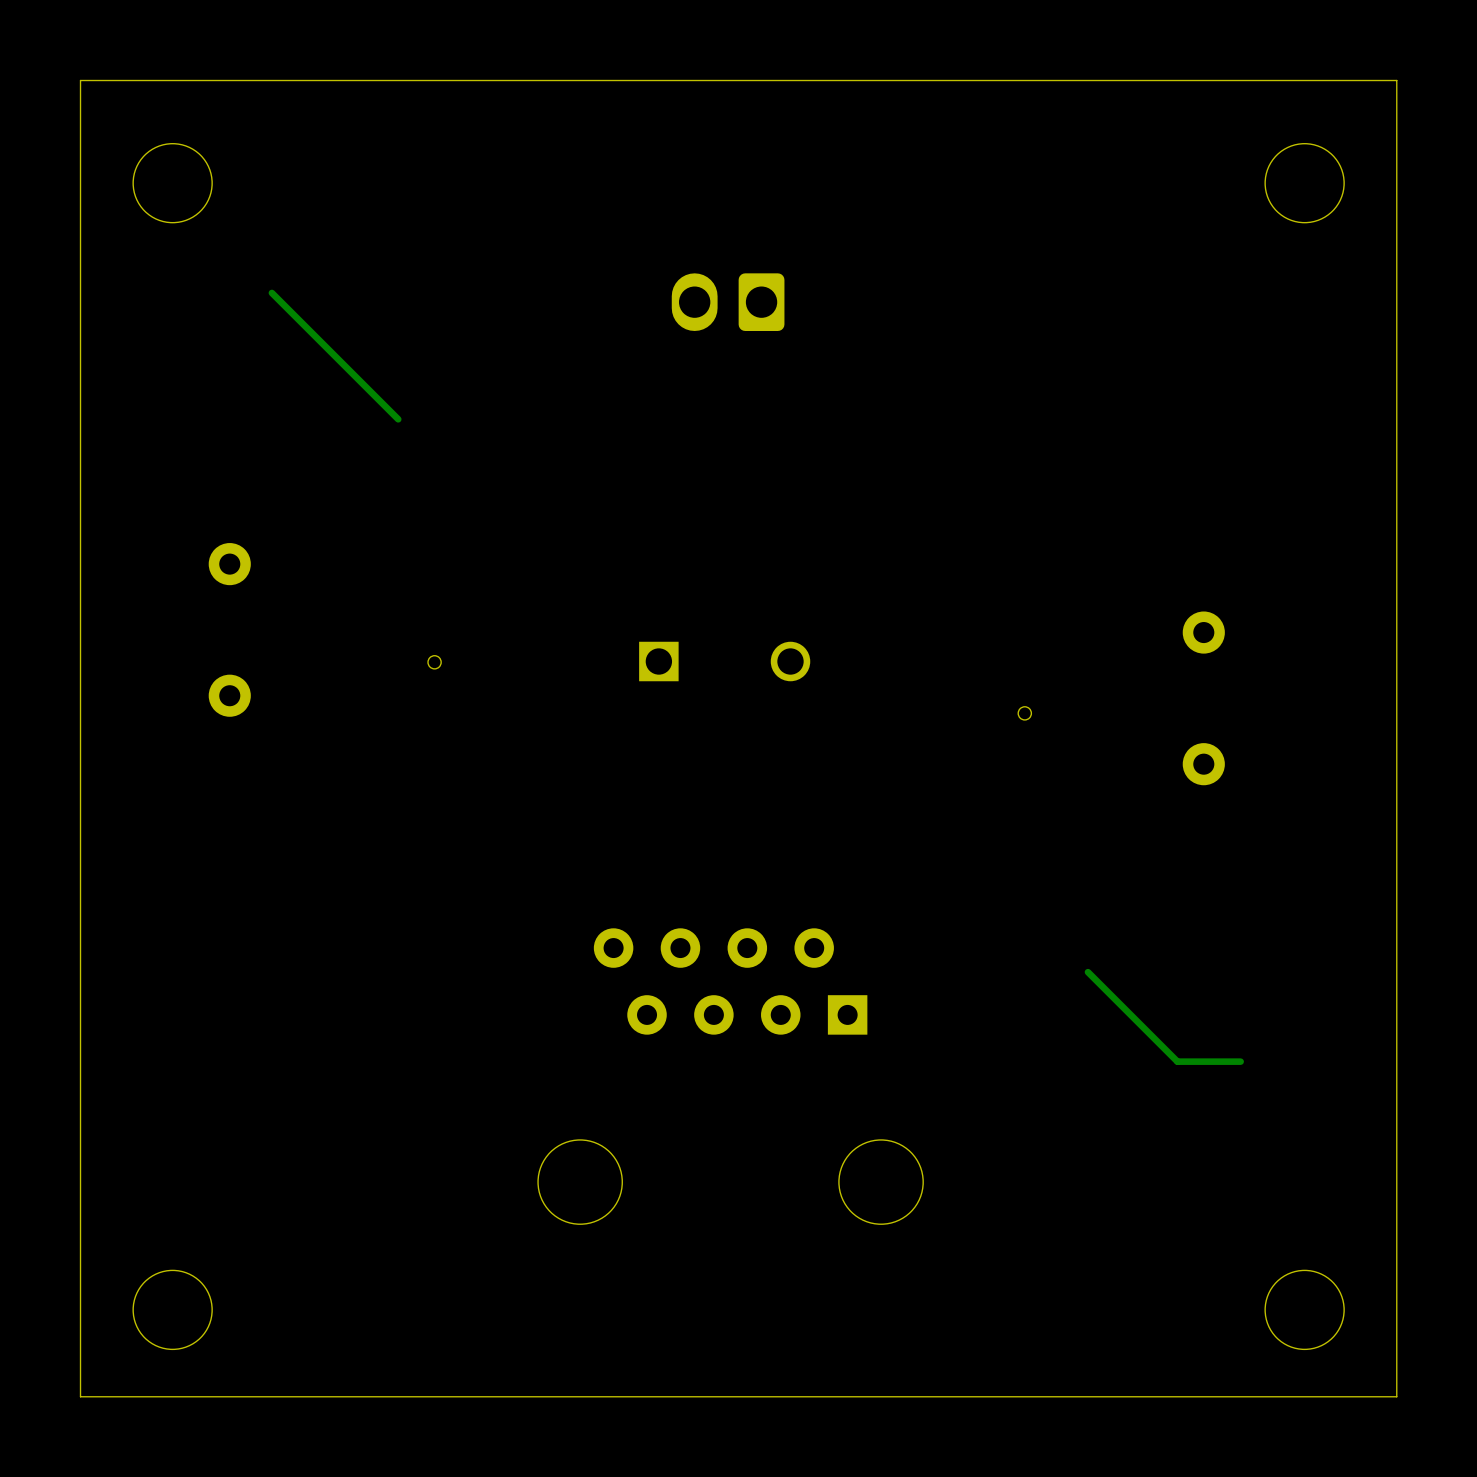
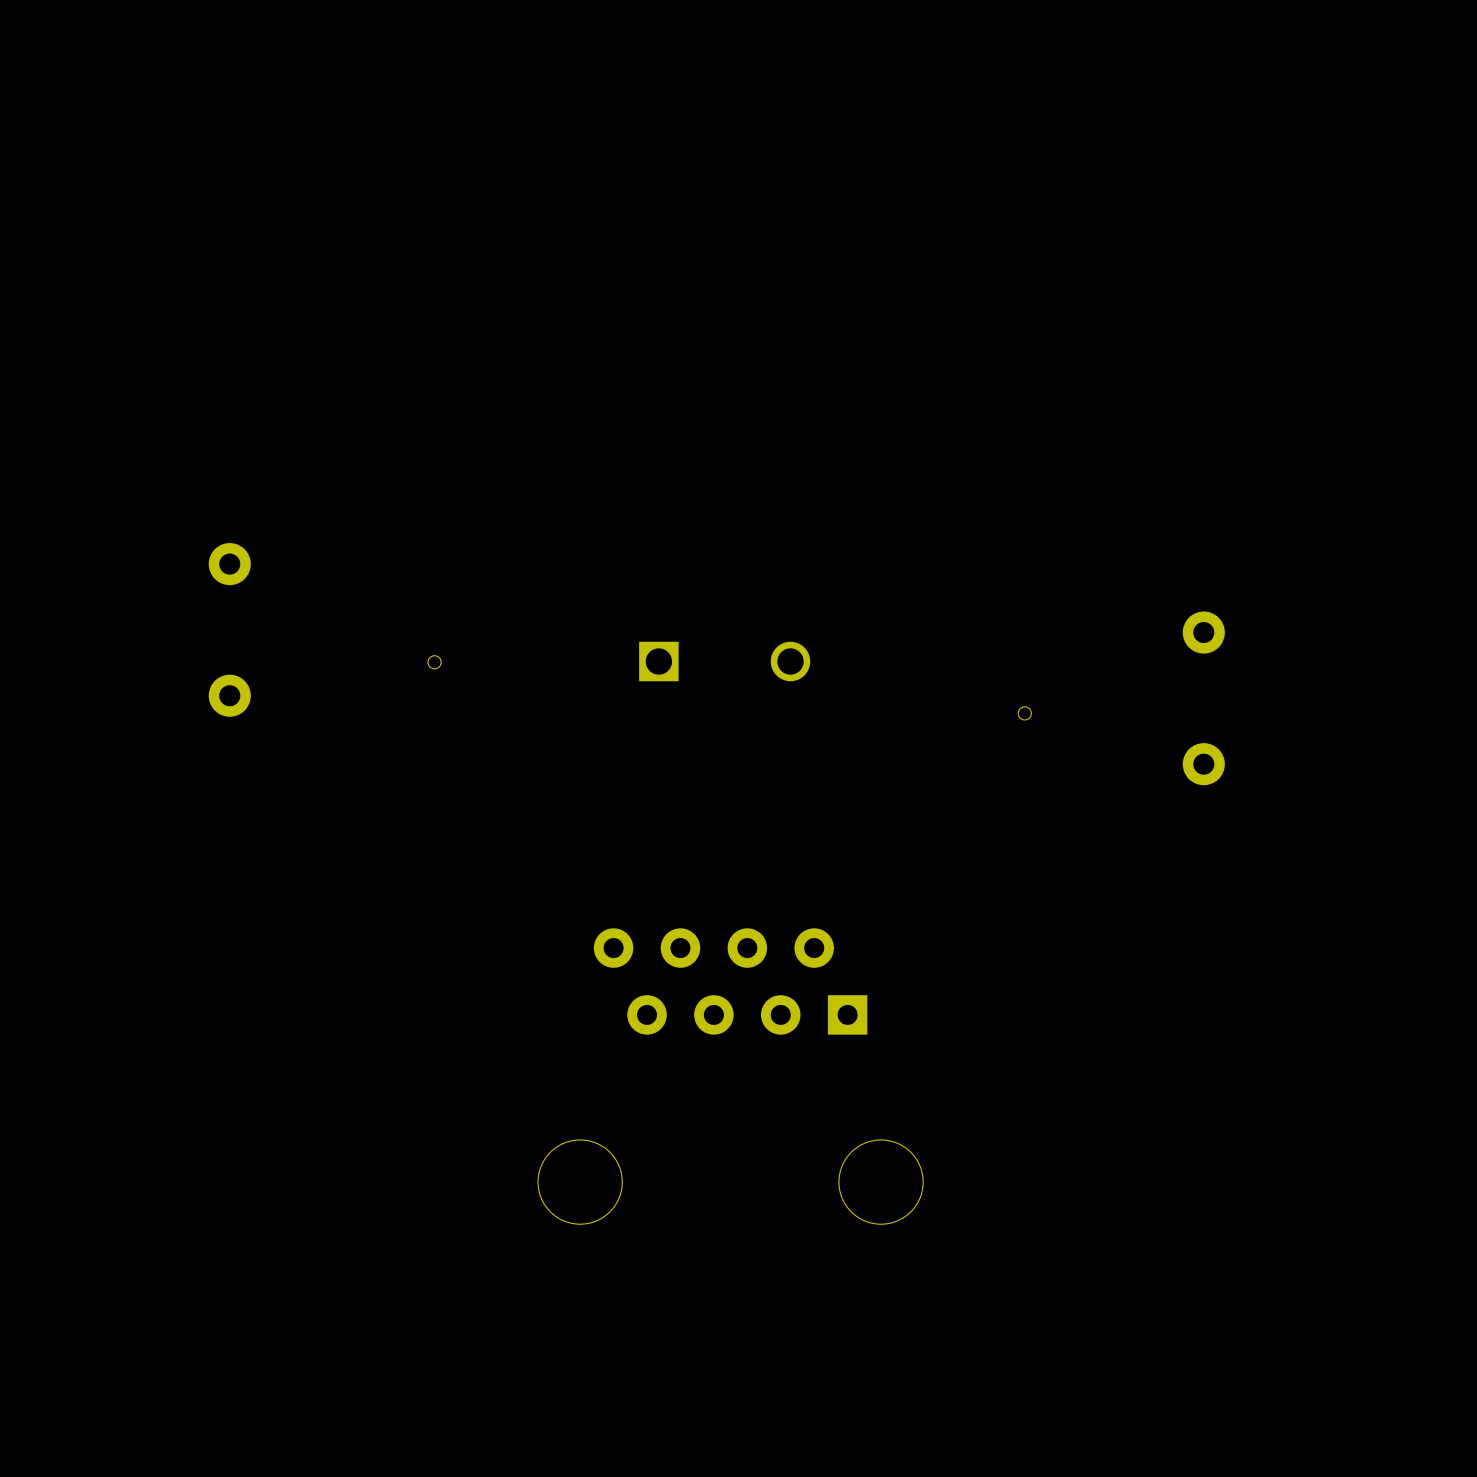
board edge: (1396, 80) (80, 80) (80, 1396) (1396, 1396) (1396, 80) -> none
round board edge: [132, 143, 213, 224] -> none
round board edge: [1264, 143, 1345, 224] -> none
track: (271, 292) (398, 419) -> none
part: (728, 302) -> none
track: (1087, 972) (1177, 1061) (1240, 1061) -> none
round board edge: [132, 1269, 213, 1351] -> none
round board edge: [1264, 1269, 1345, 1351] -> none

